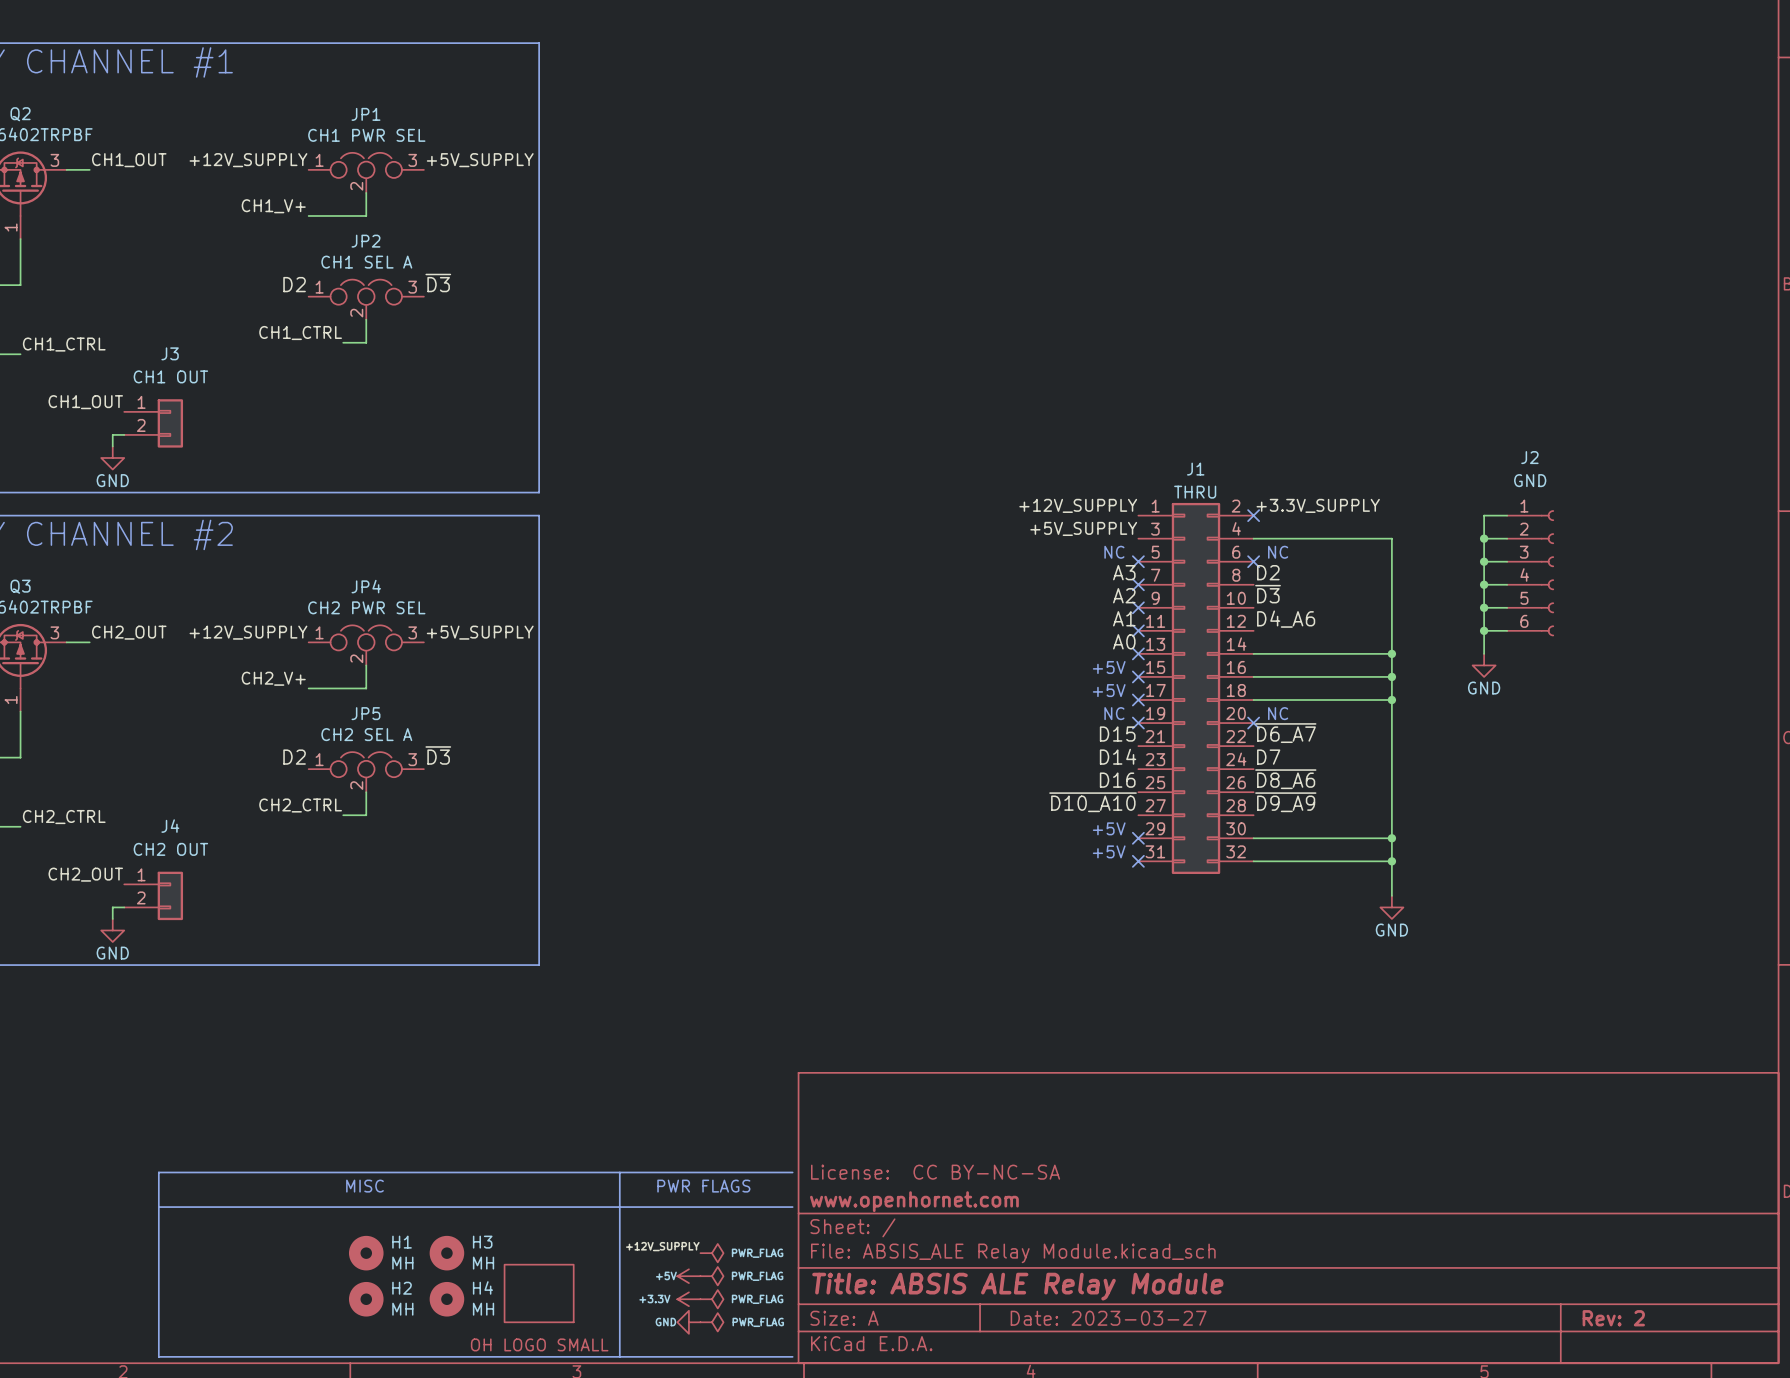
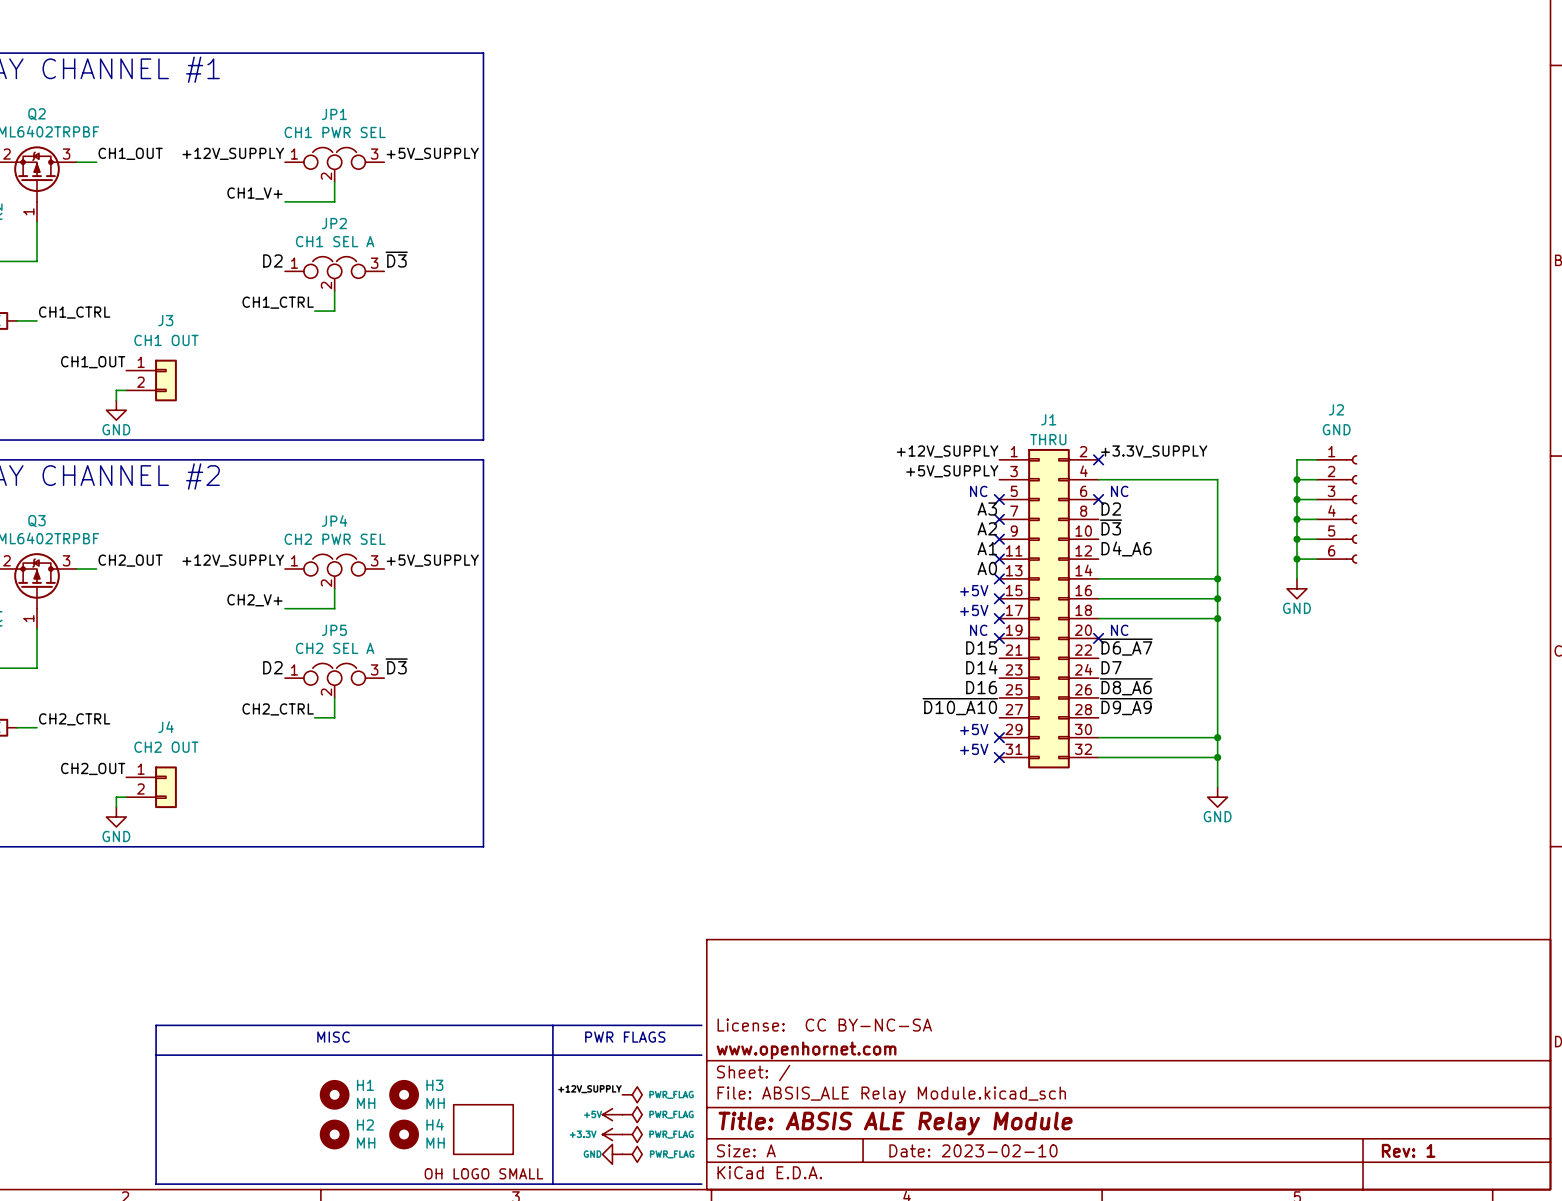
title block: Date: 2023-03-27 (1108, 1318) -> Date: 2023-02-10 (973, 1150)
title block: Rev: 2 (1613, 1318) -> Rev: 1 (1408, 1150)

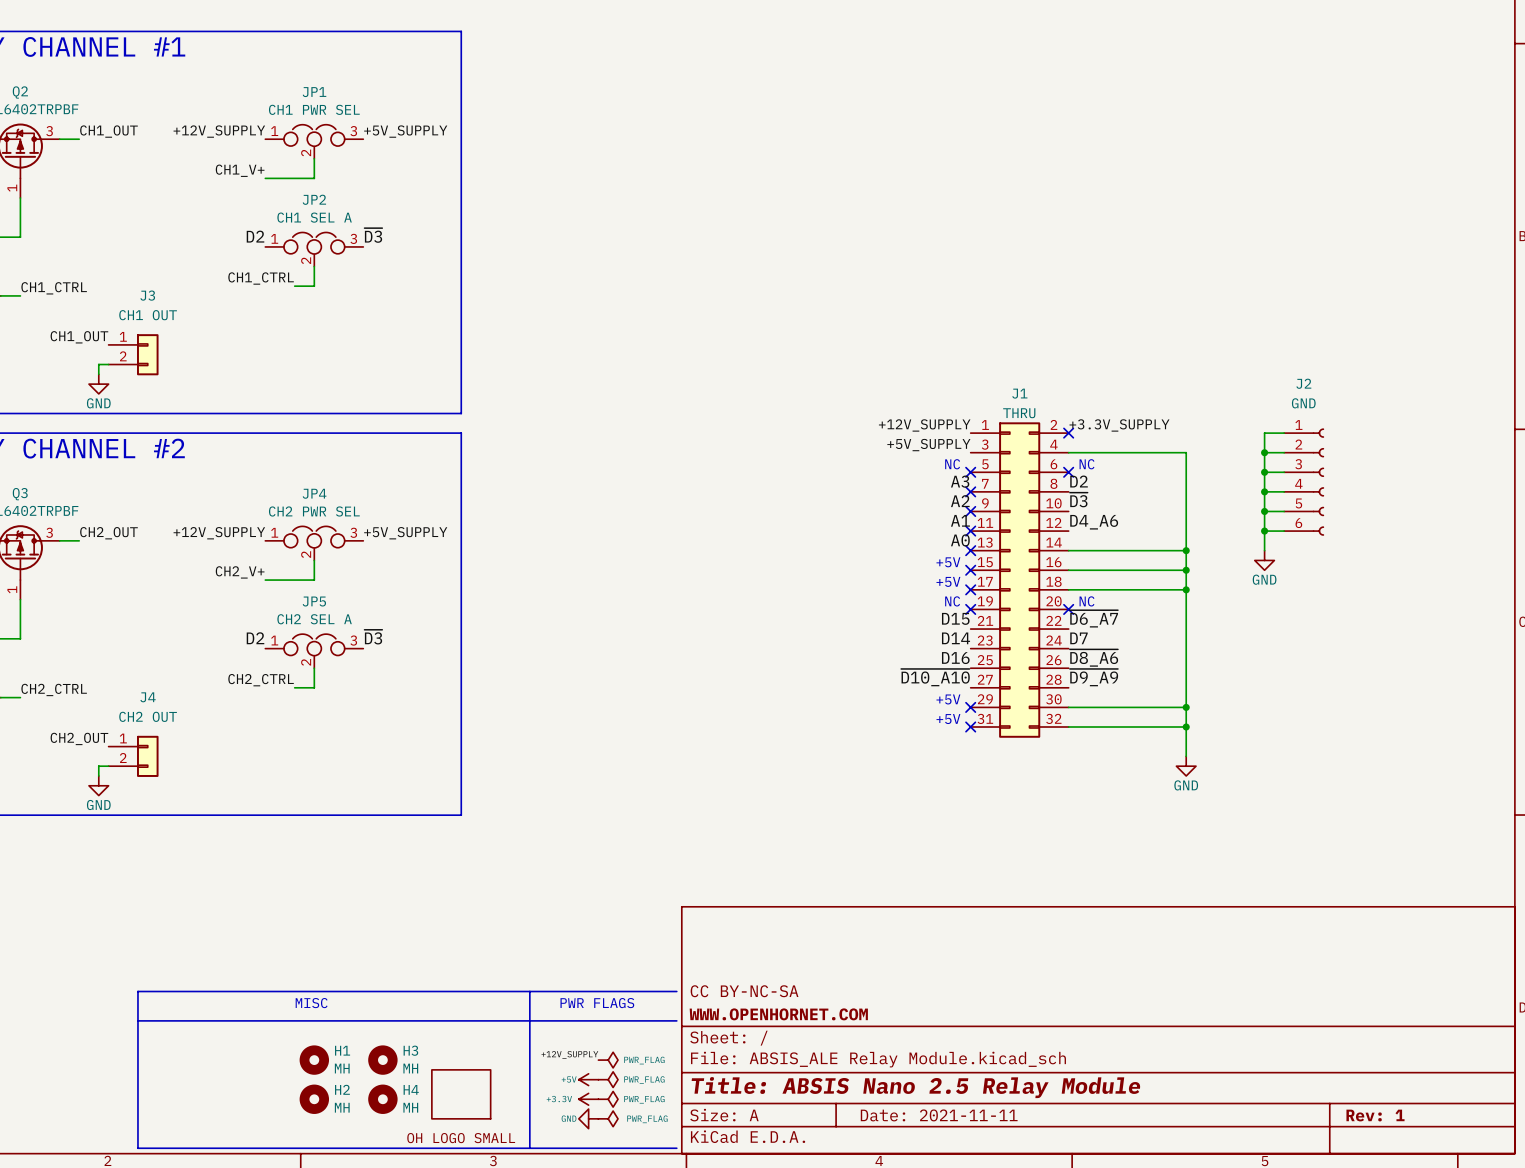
title block: License: CC BY-NC-SA (824, 1025) -> CC BY-NC-SA (744, 991)
title block: www.openhornet.com (806, 1050) -> WWW.OPENHORNET.COM (778, 1014)
title block: Title: ABSIS ALE Relay Module (895, 1123) -> Title: ABSIS Nano 2.5 Relay Module (915, 1087)
title block: Date: 2023-02-10 (973, 1150) -> Date: 2021-11-11 (939, 1115)

